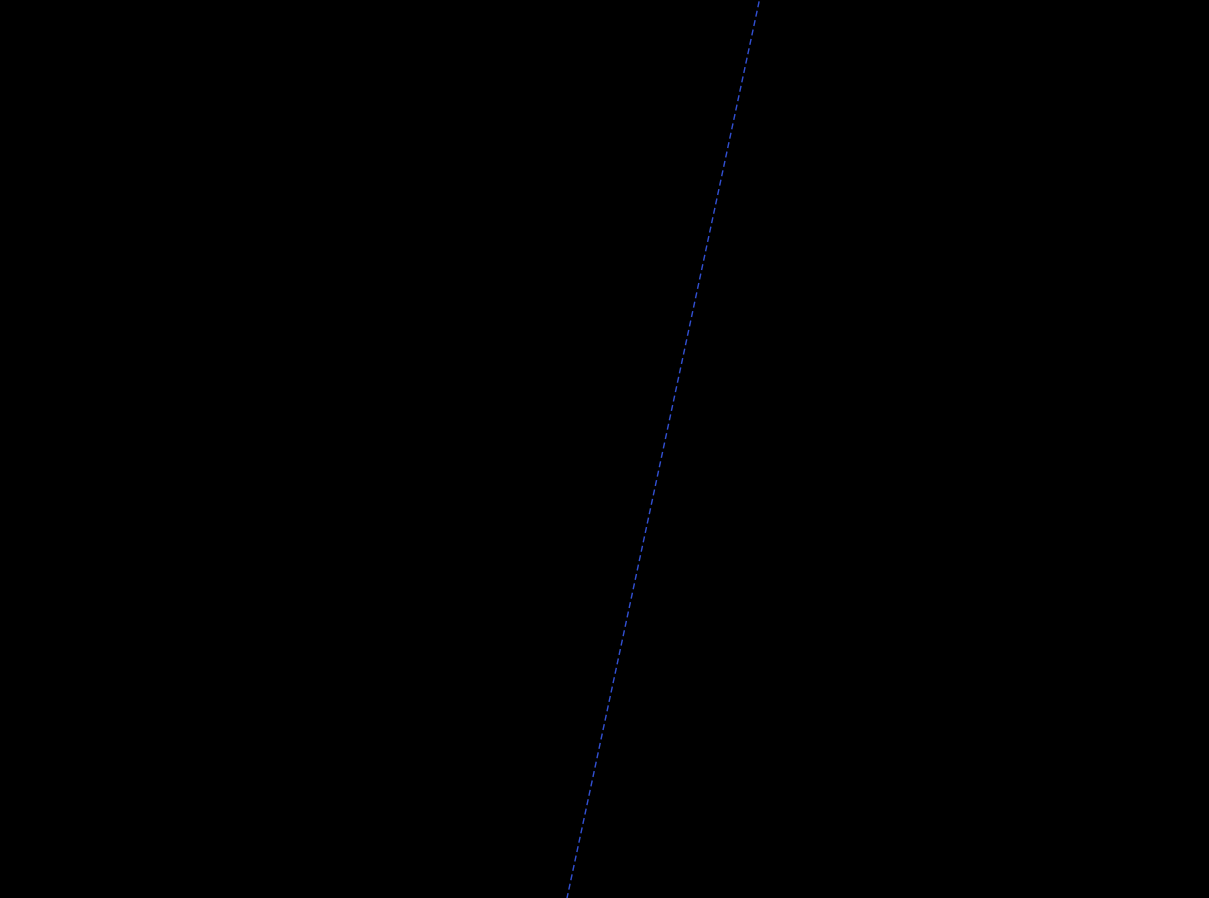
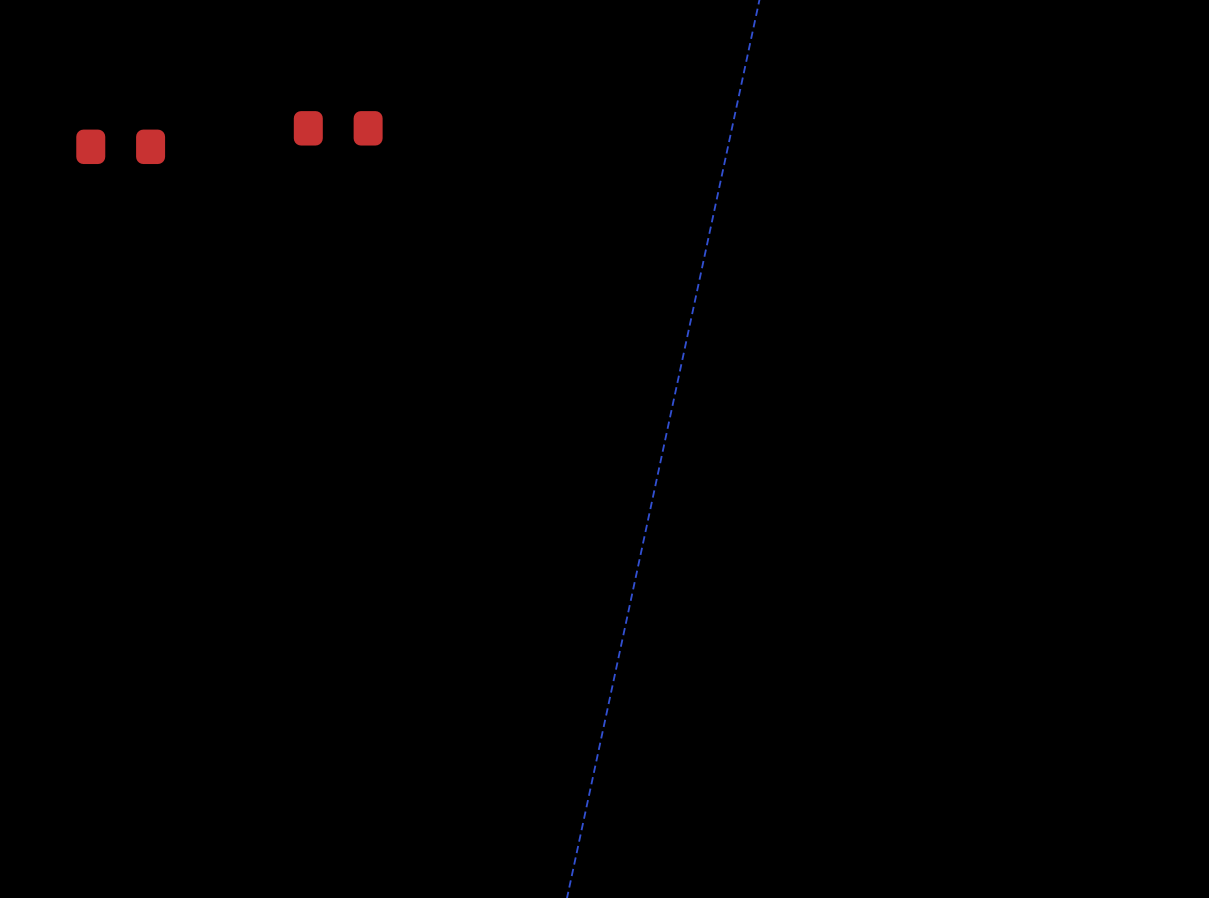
part: none -> (338, 128)
part: none -> (120, 146)

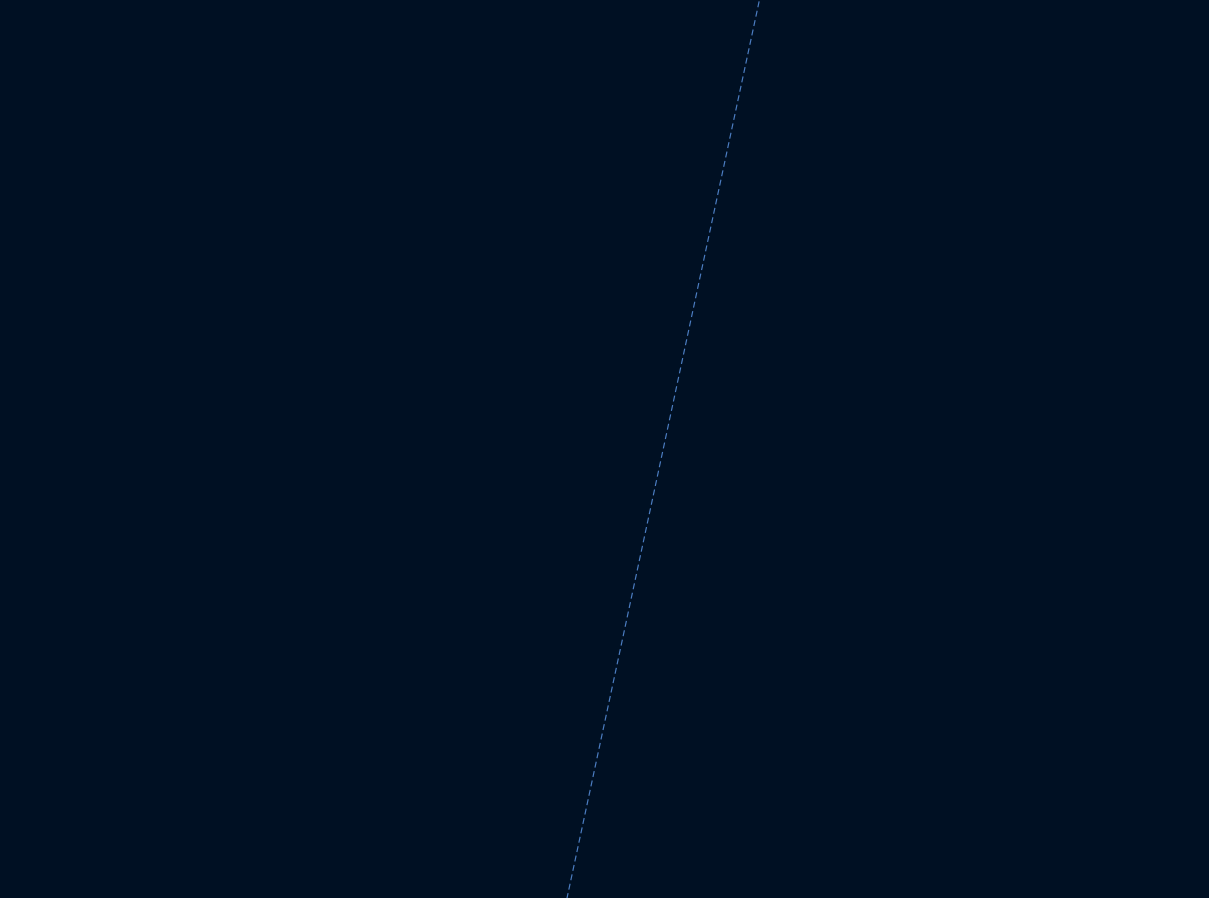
part: (338, 128) -> none
part: (120, 146) -> none

